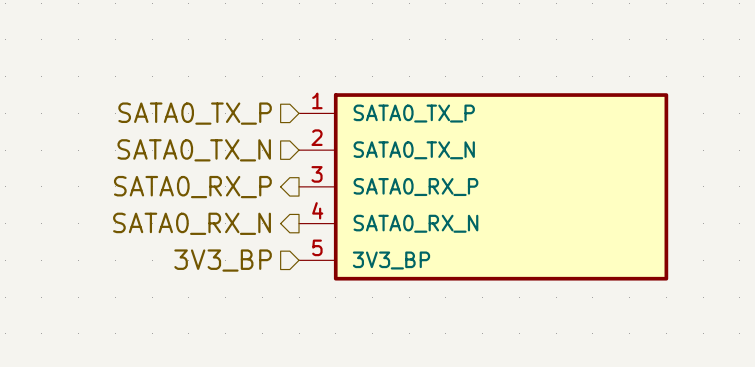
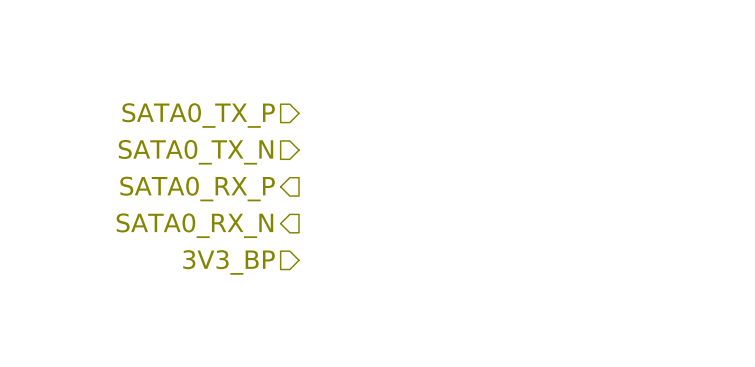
power symbol: (483, 186) -> none

